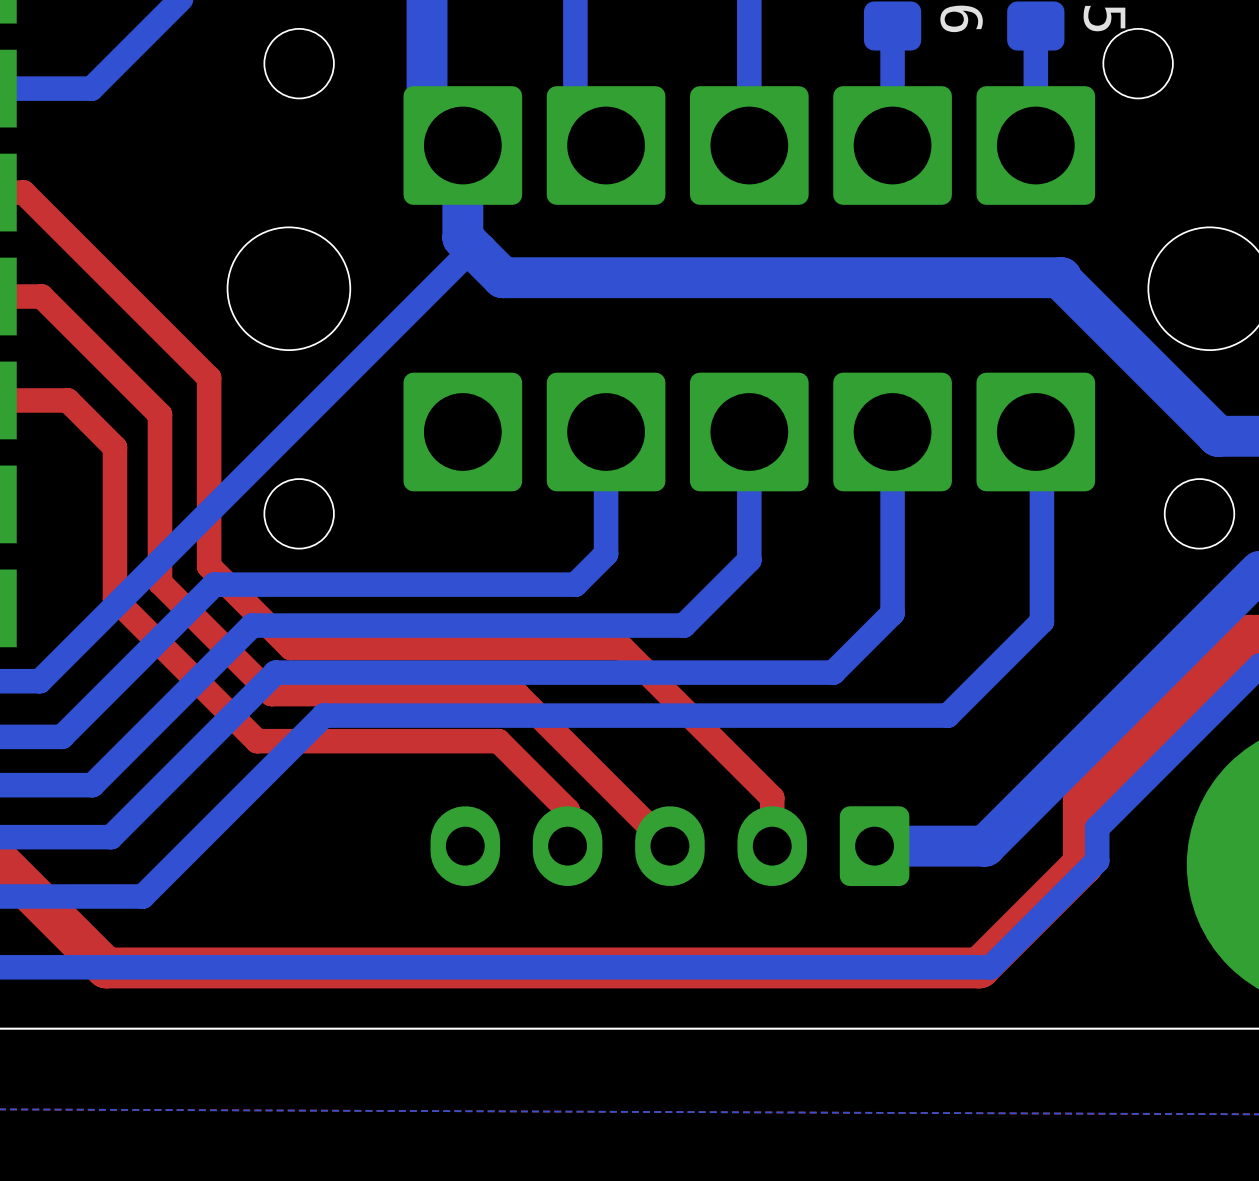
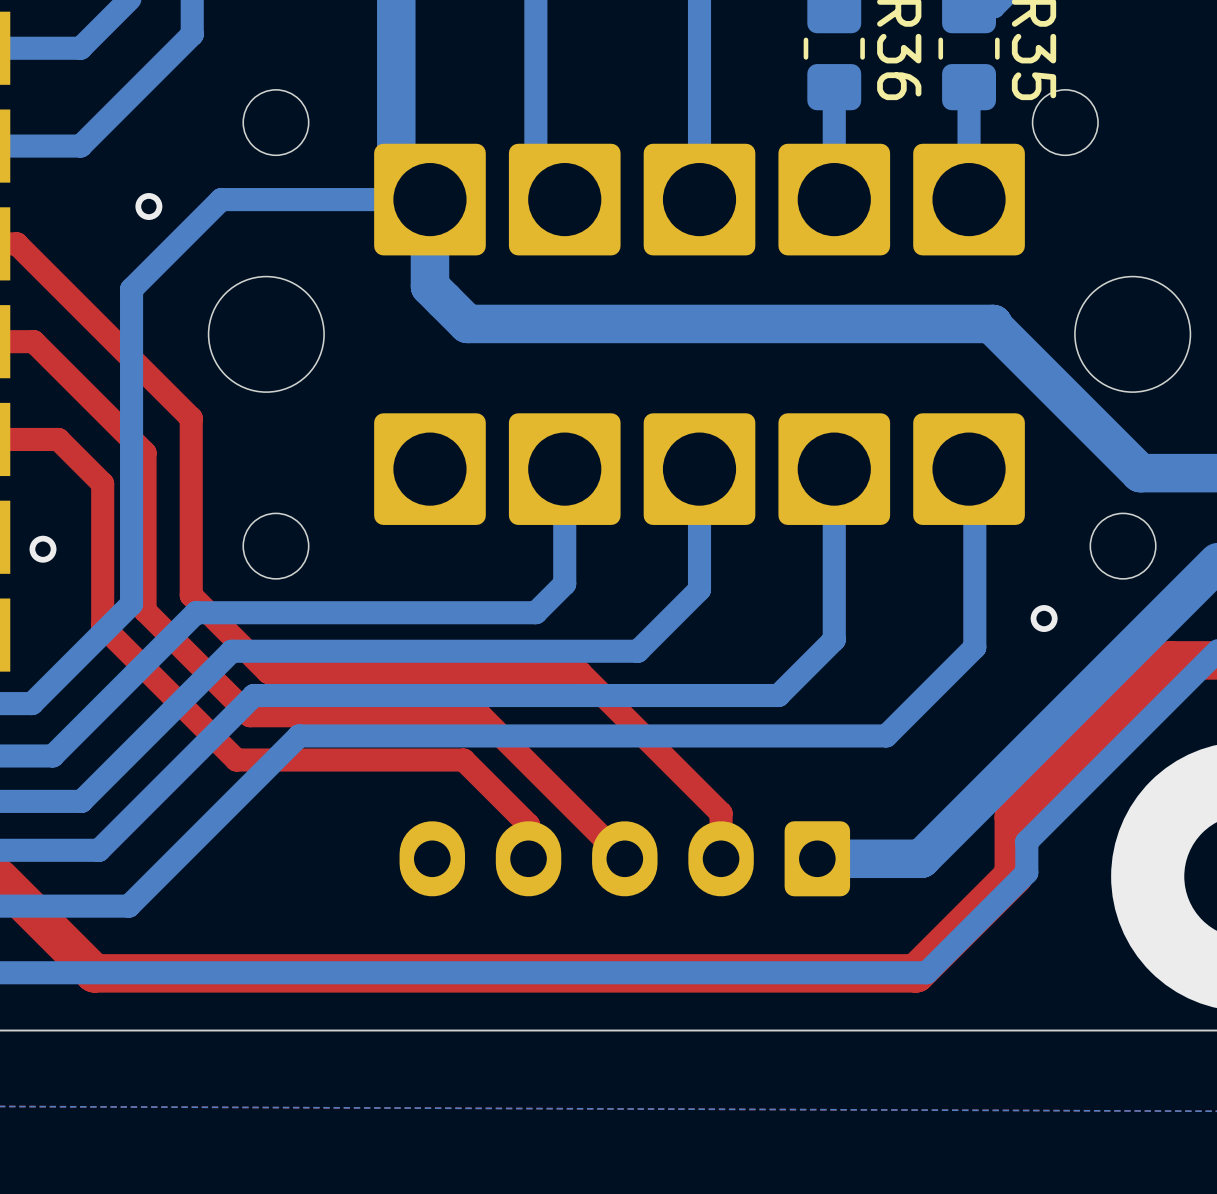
via: none -> (148, 206)
bottom track: (468, 252) (145, 575) -> (429, 199) (221, 199) (131, 289) (131, 604)
via: none -> (43, 549)
via: none -> (1044, 618)

